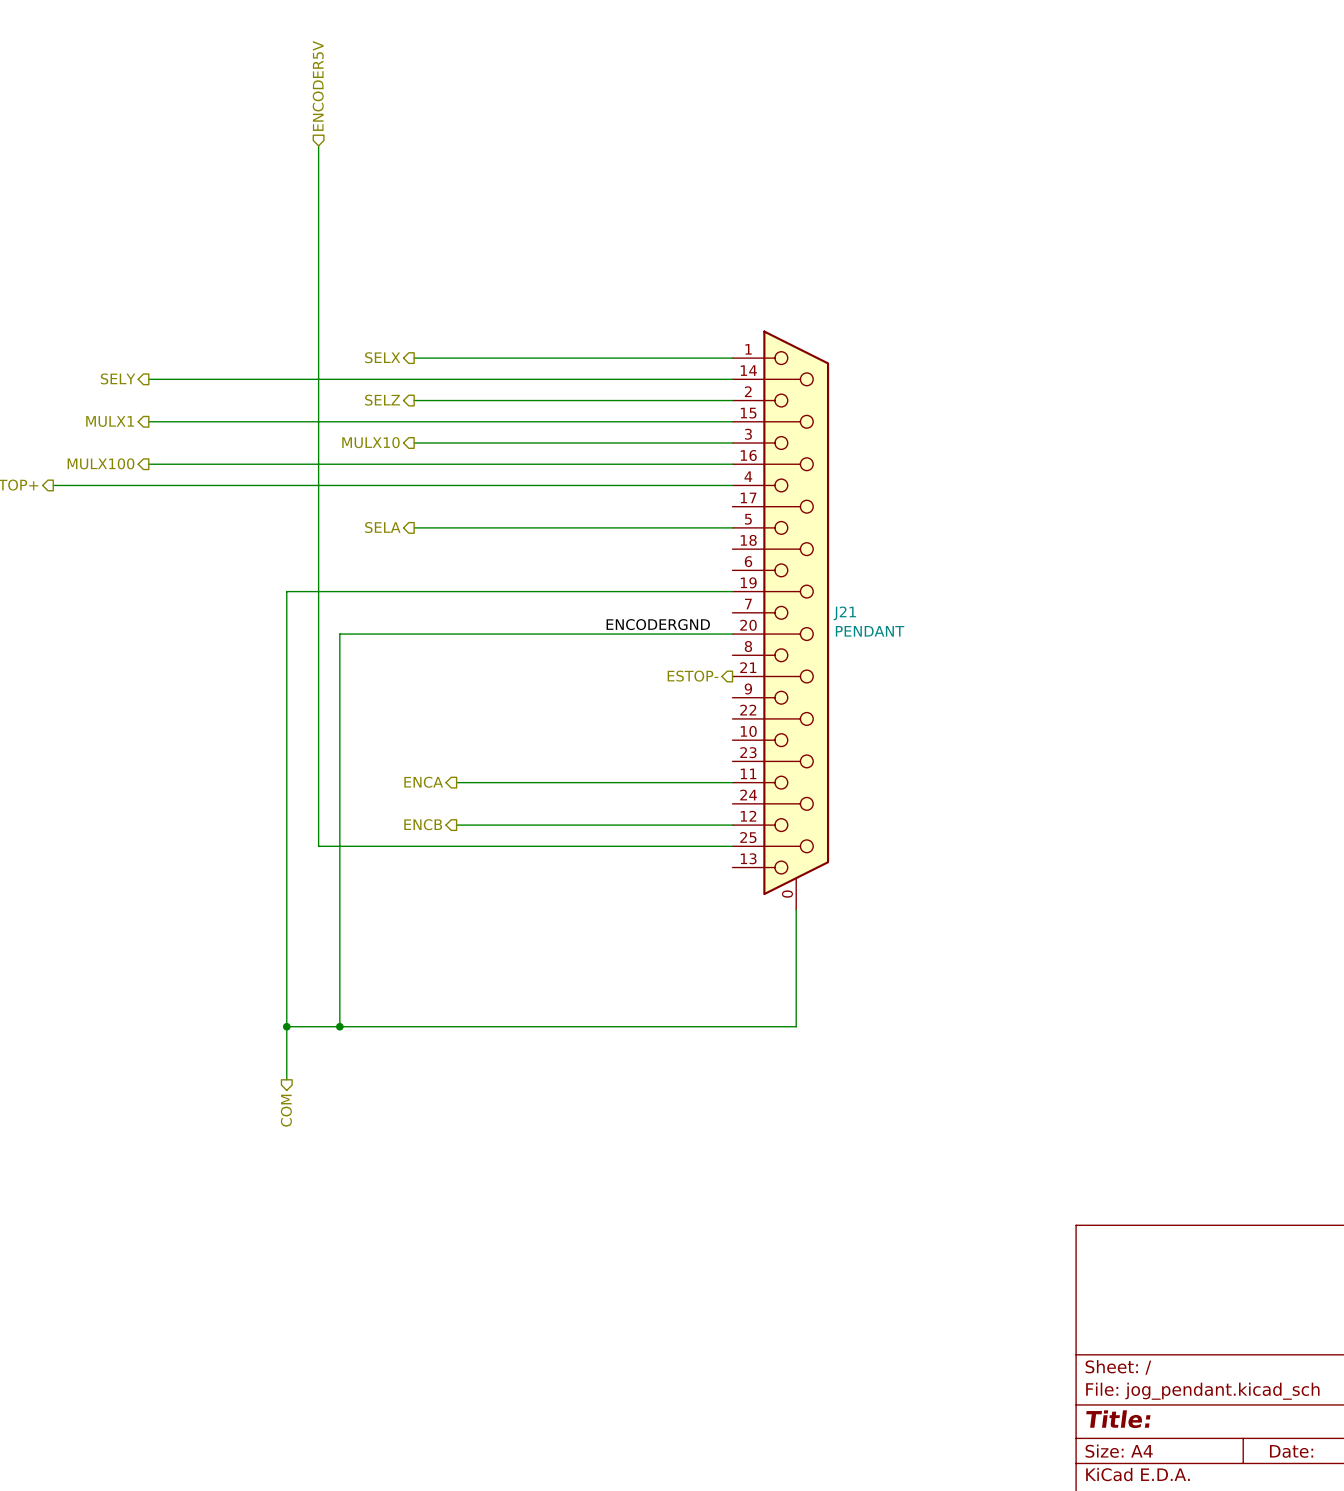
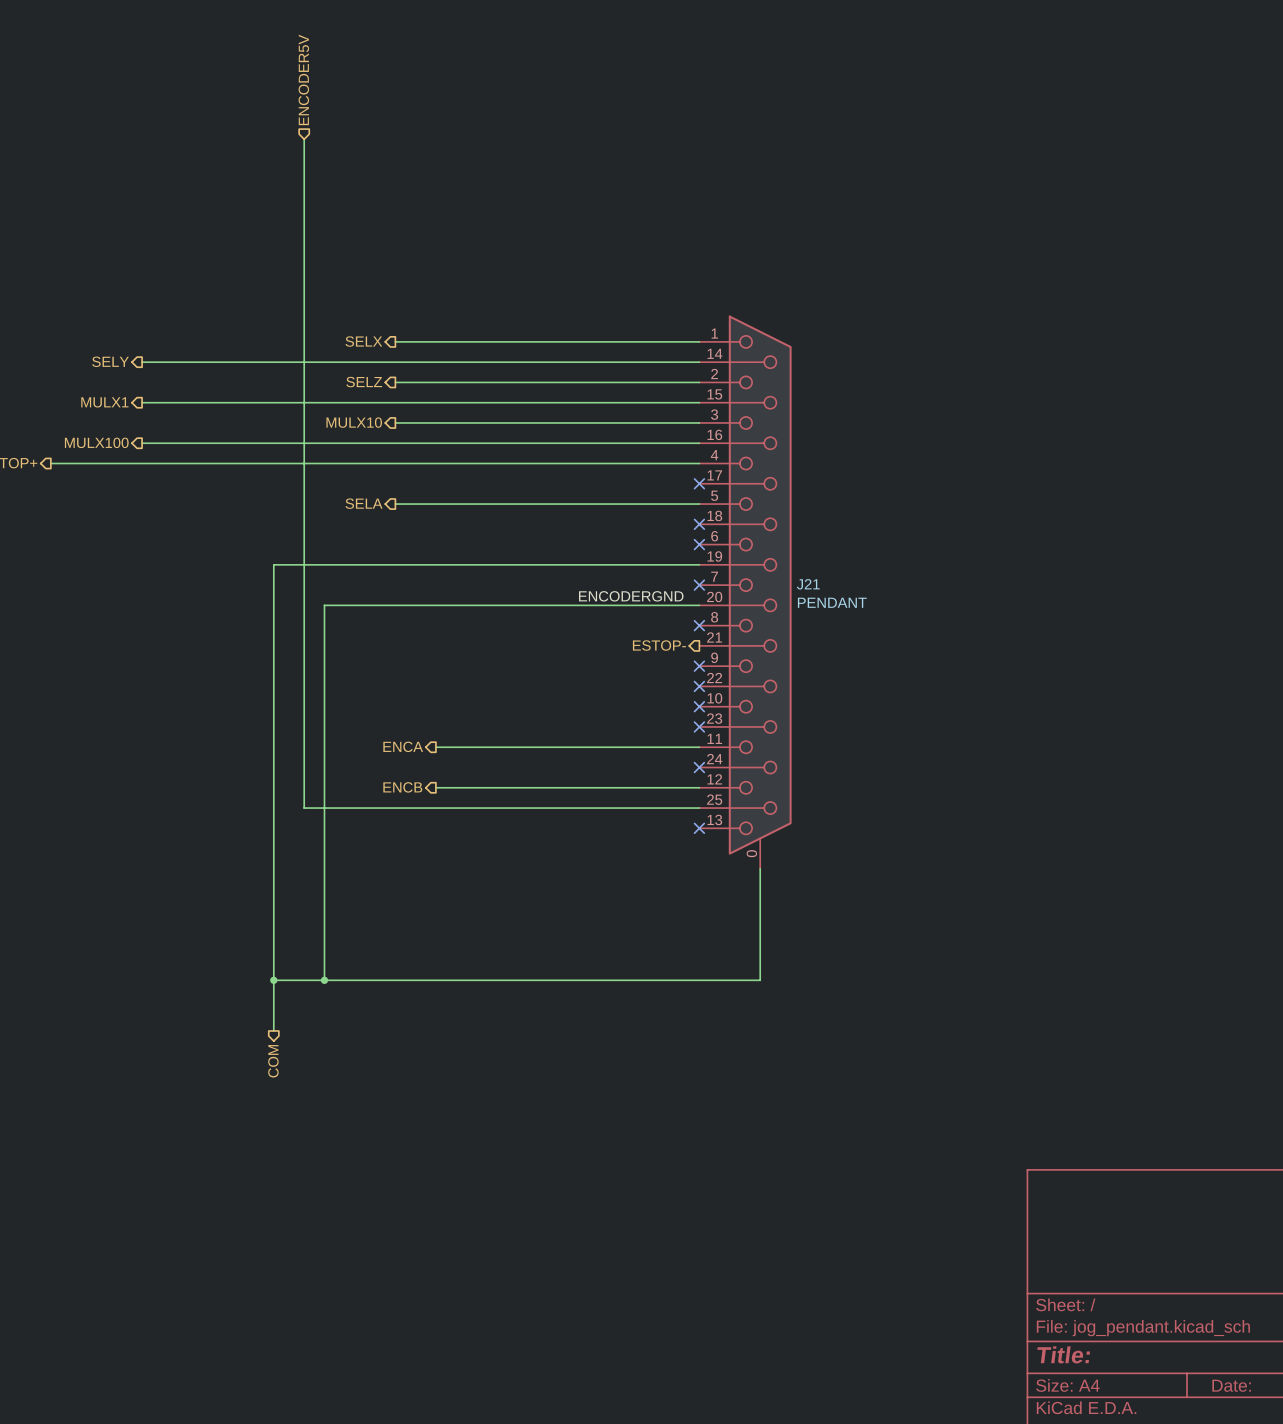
no-connect mark: none -> (699, 483)
no-connect mark: none -> (699, 524)
no-connect mark: none -> (699, 544)
no-connect mark: none -> (699, 585)
no-connect mark: none -> (699, 625)
no-connect mark: none -> (699, 666)
no-connect mark: none -> (699, 686)
no-connect mark: none -> (699, 706)
no-connect mark: none -> (699, 726)
no-connect mark: none -> (699, 767)
no-connect mark: none -> (699, 828)

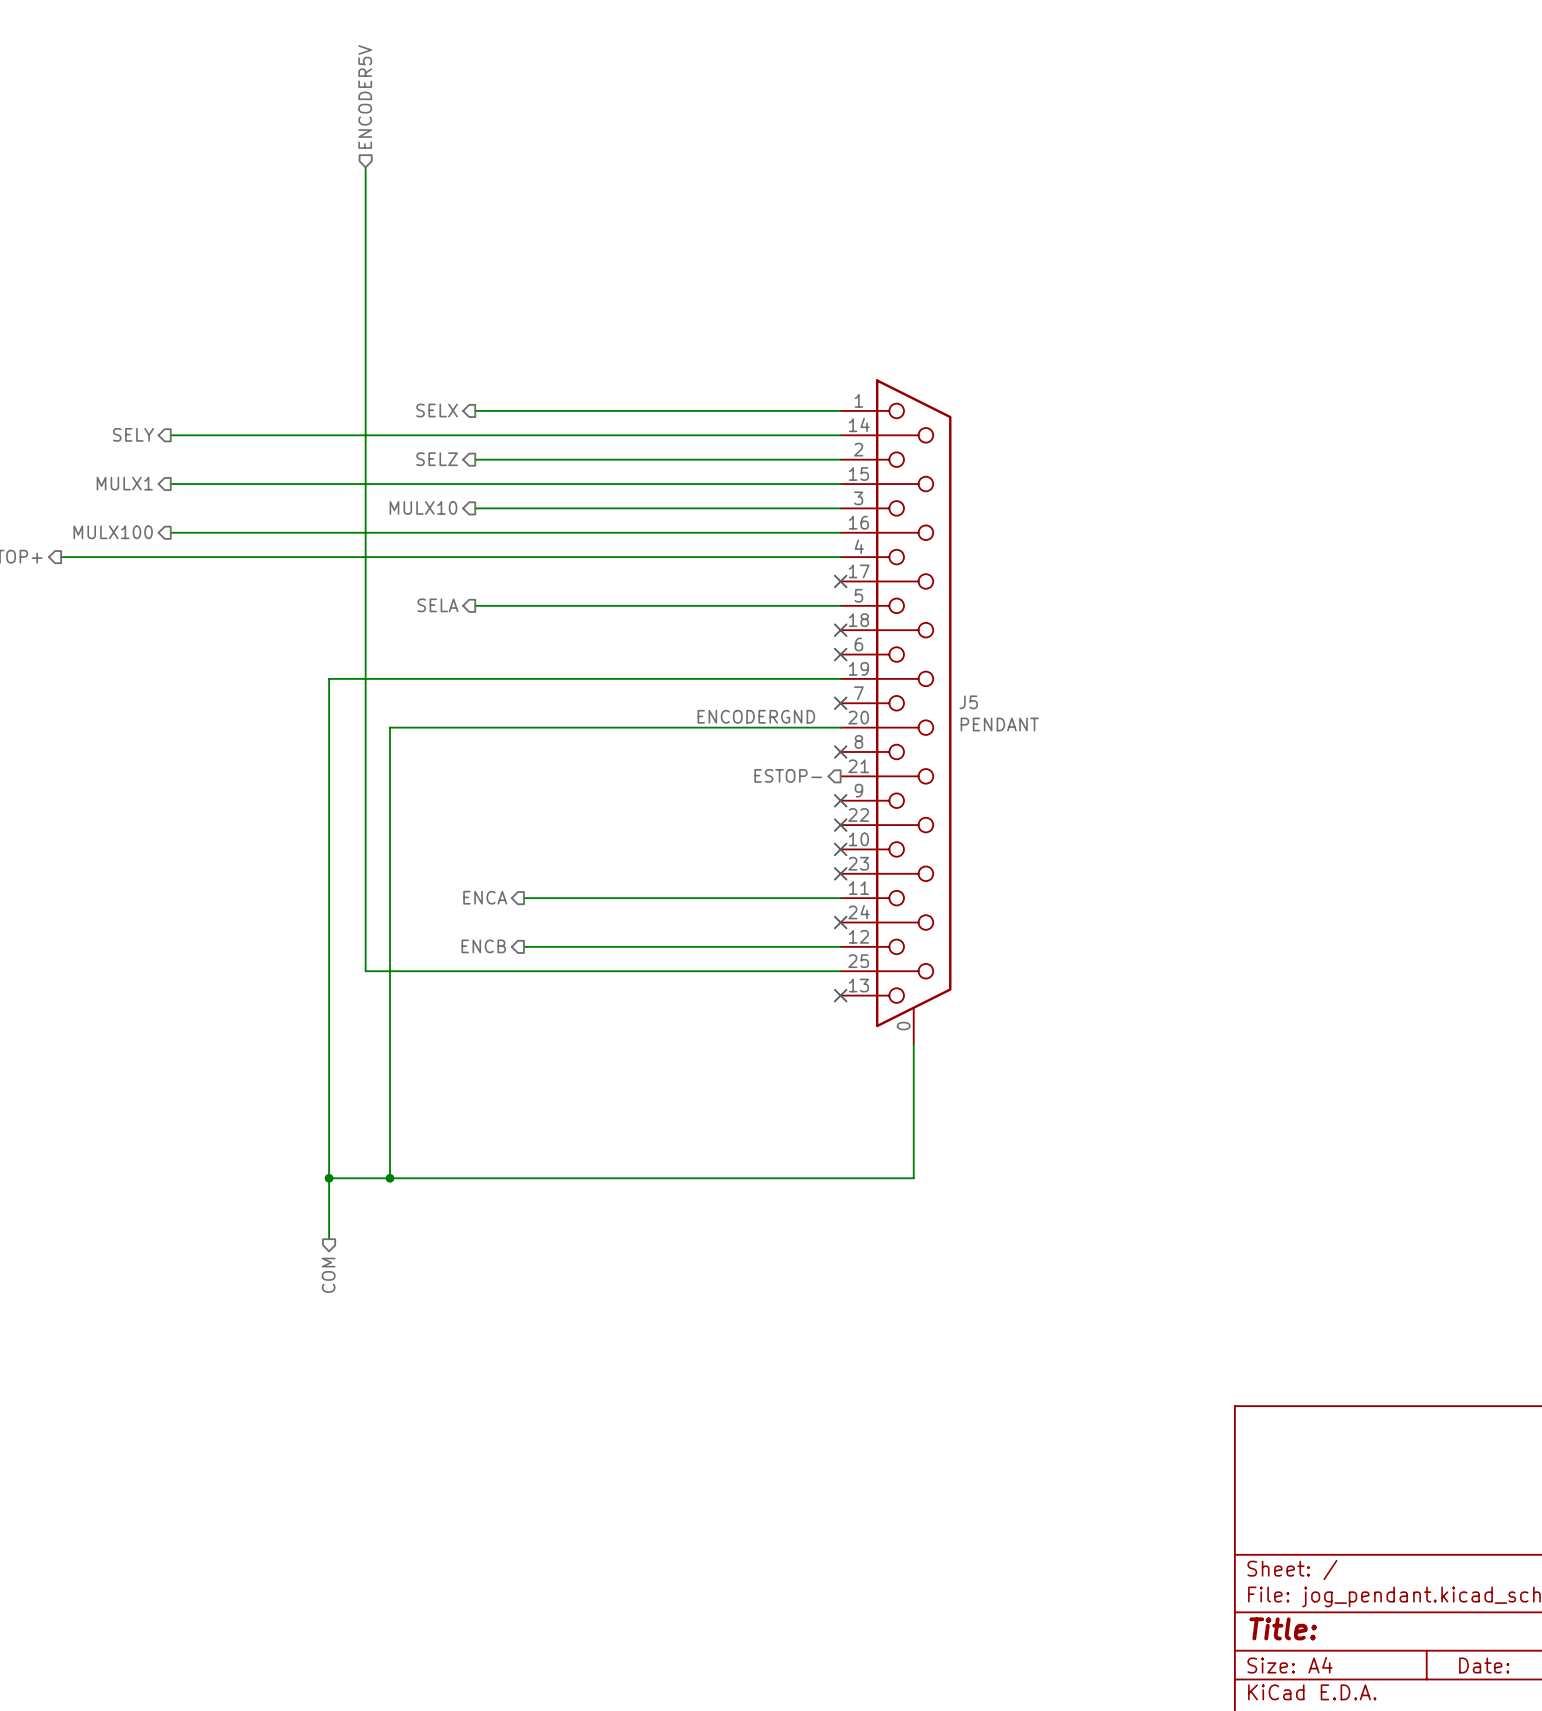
J21 name: J21 (808, 584) -> J5 (968, 702)

